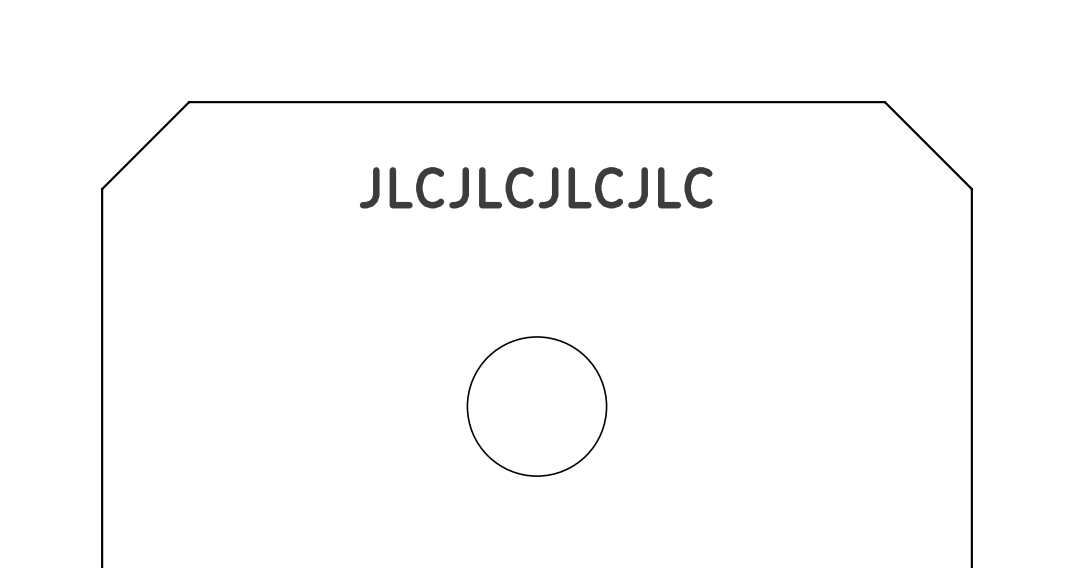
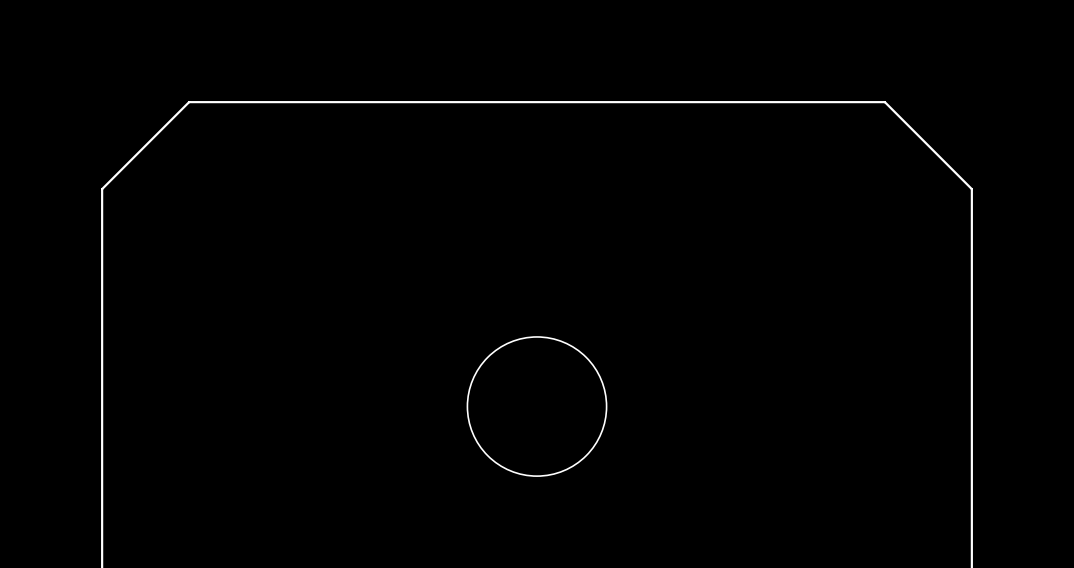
text: JLCJLCJLCJLC (536, 187) -> none

